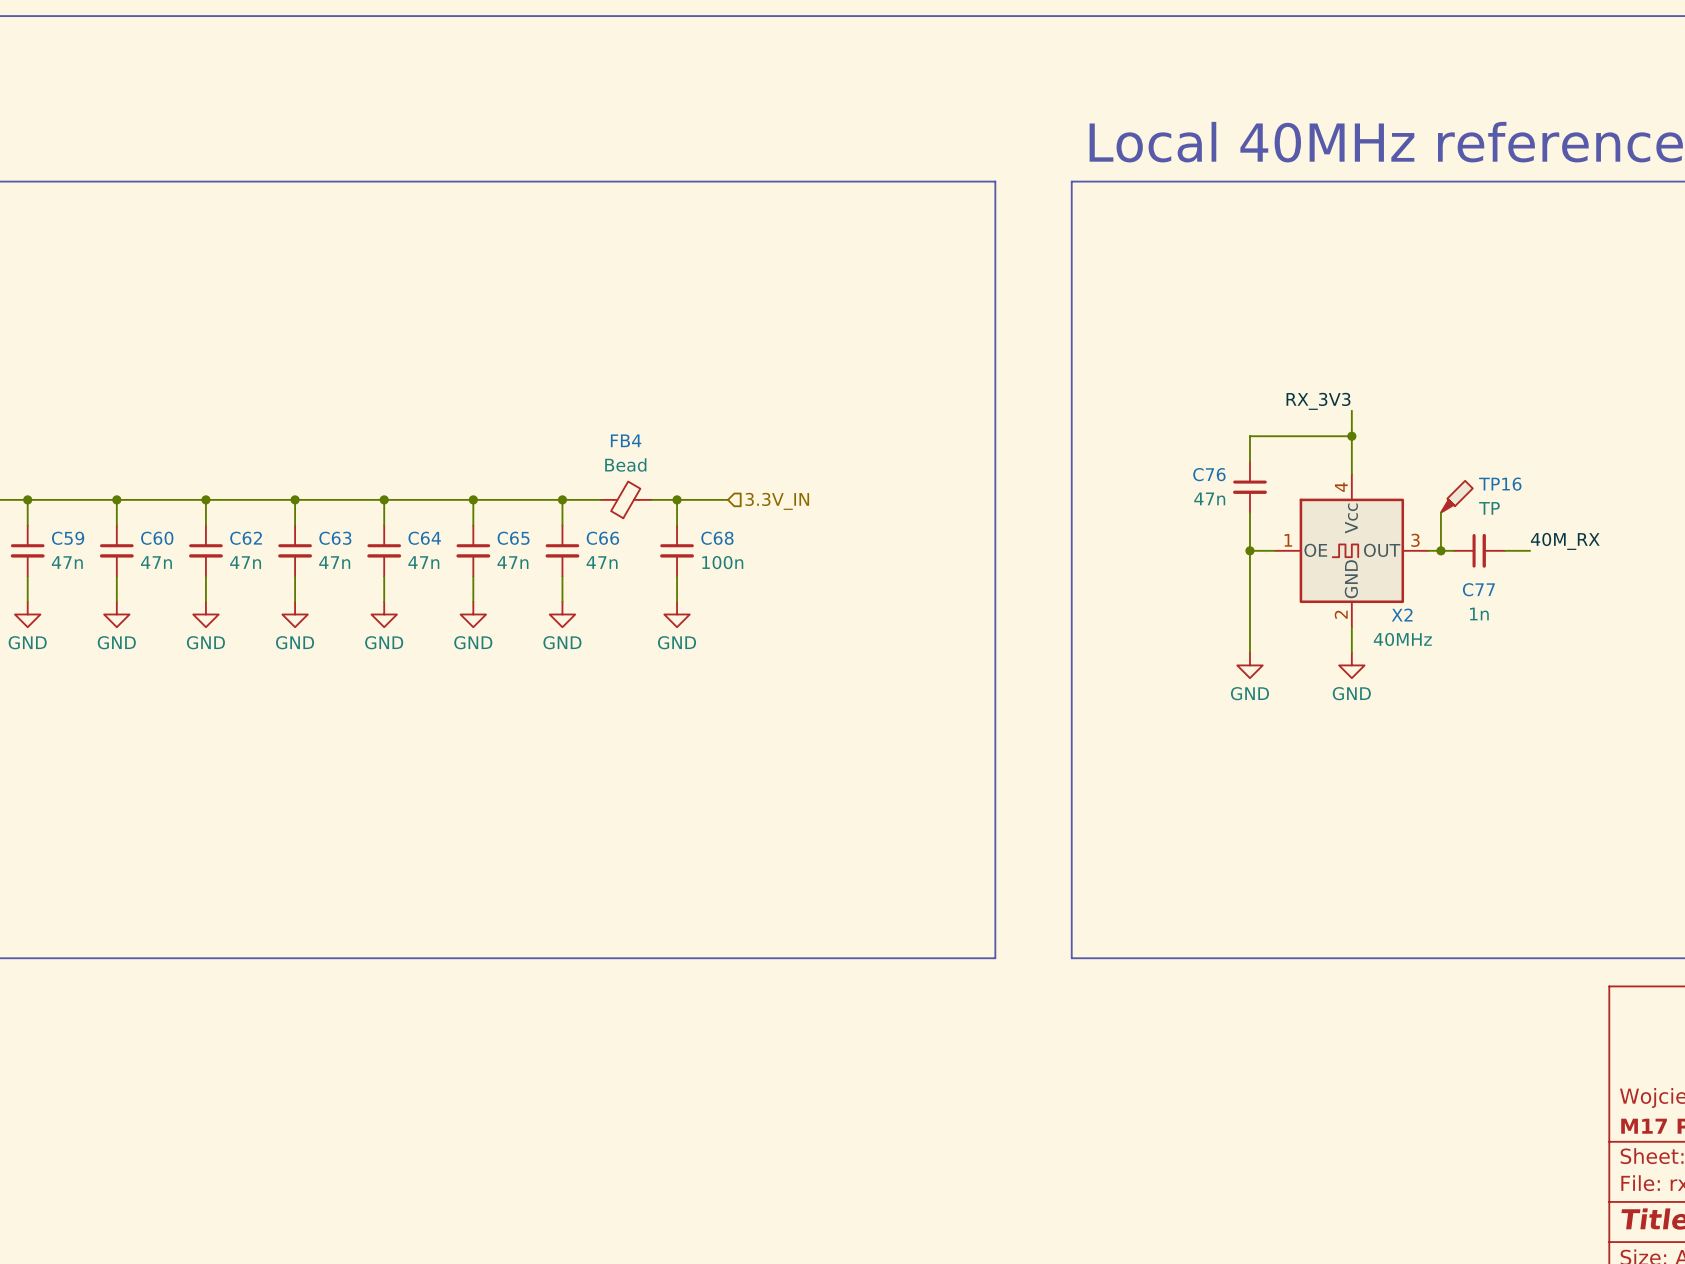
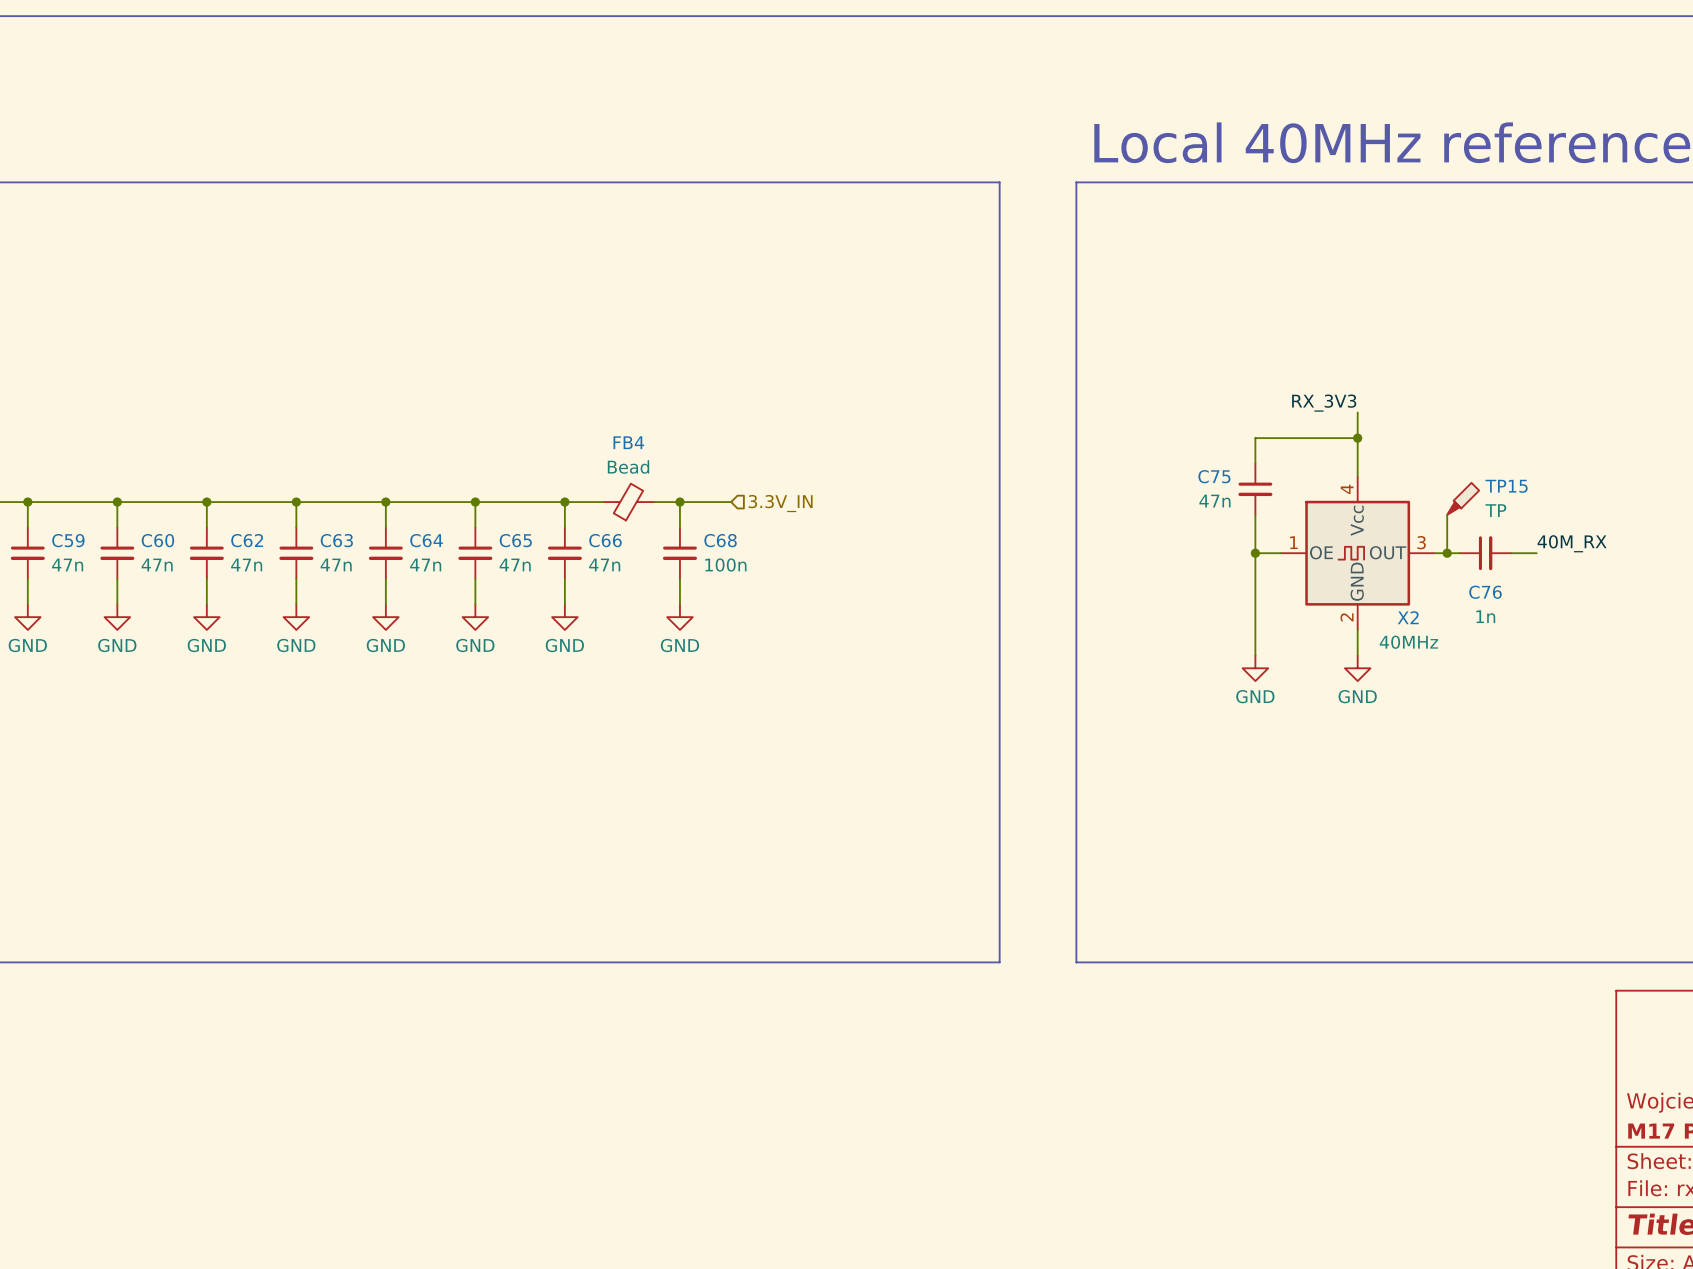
C76 name: C76 (1209, 474) -> C75 (1214, 476)
TP16 name: TP16 (1500, 484) -> TP15 (1506, 486)
C77 name: C77 (1478, 589) -> C76 (1485, 592)

